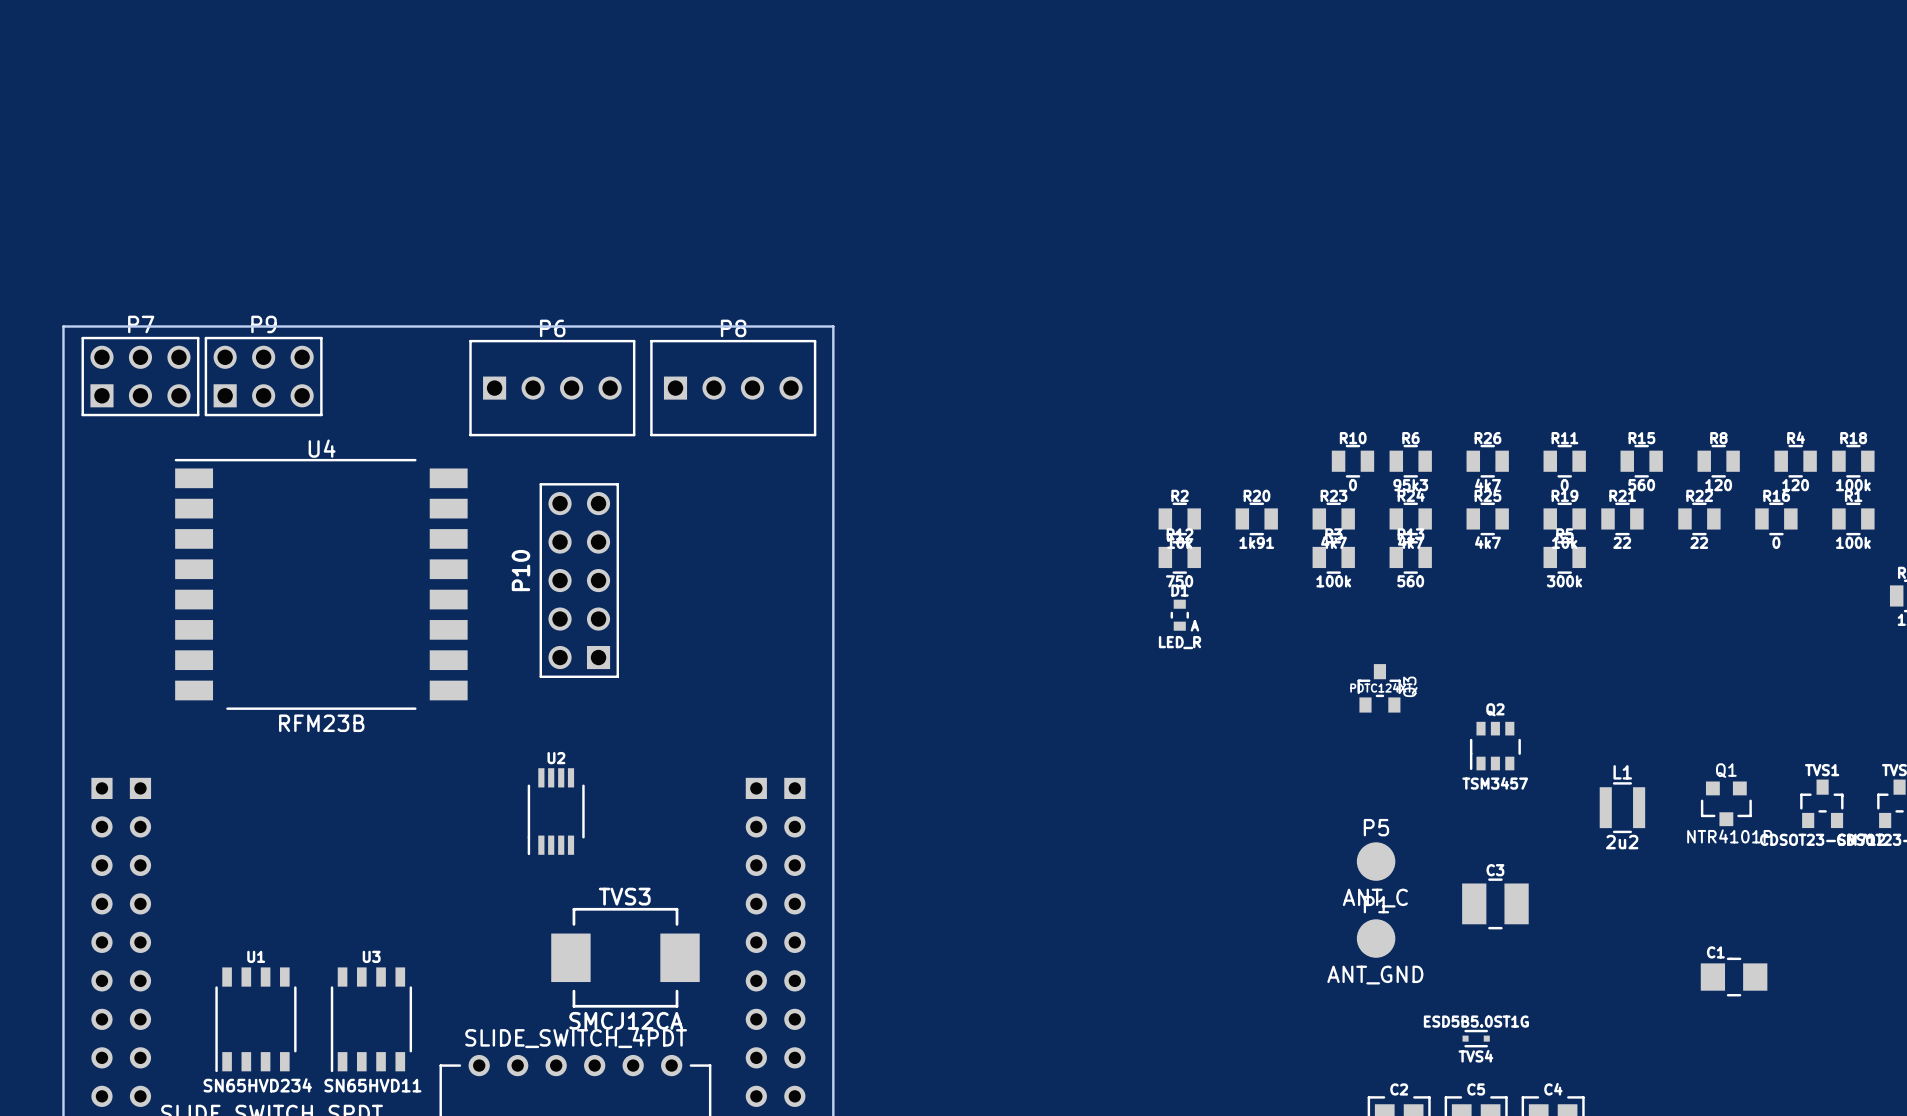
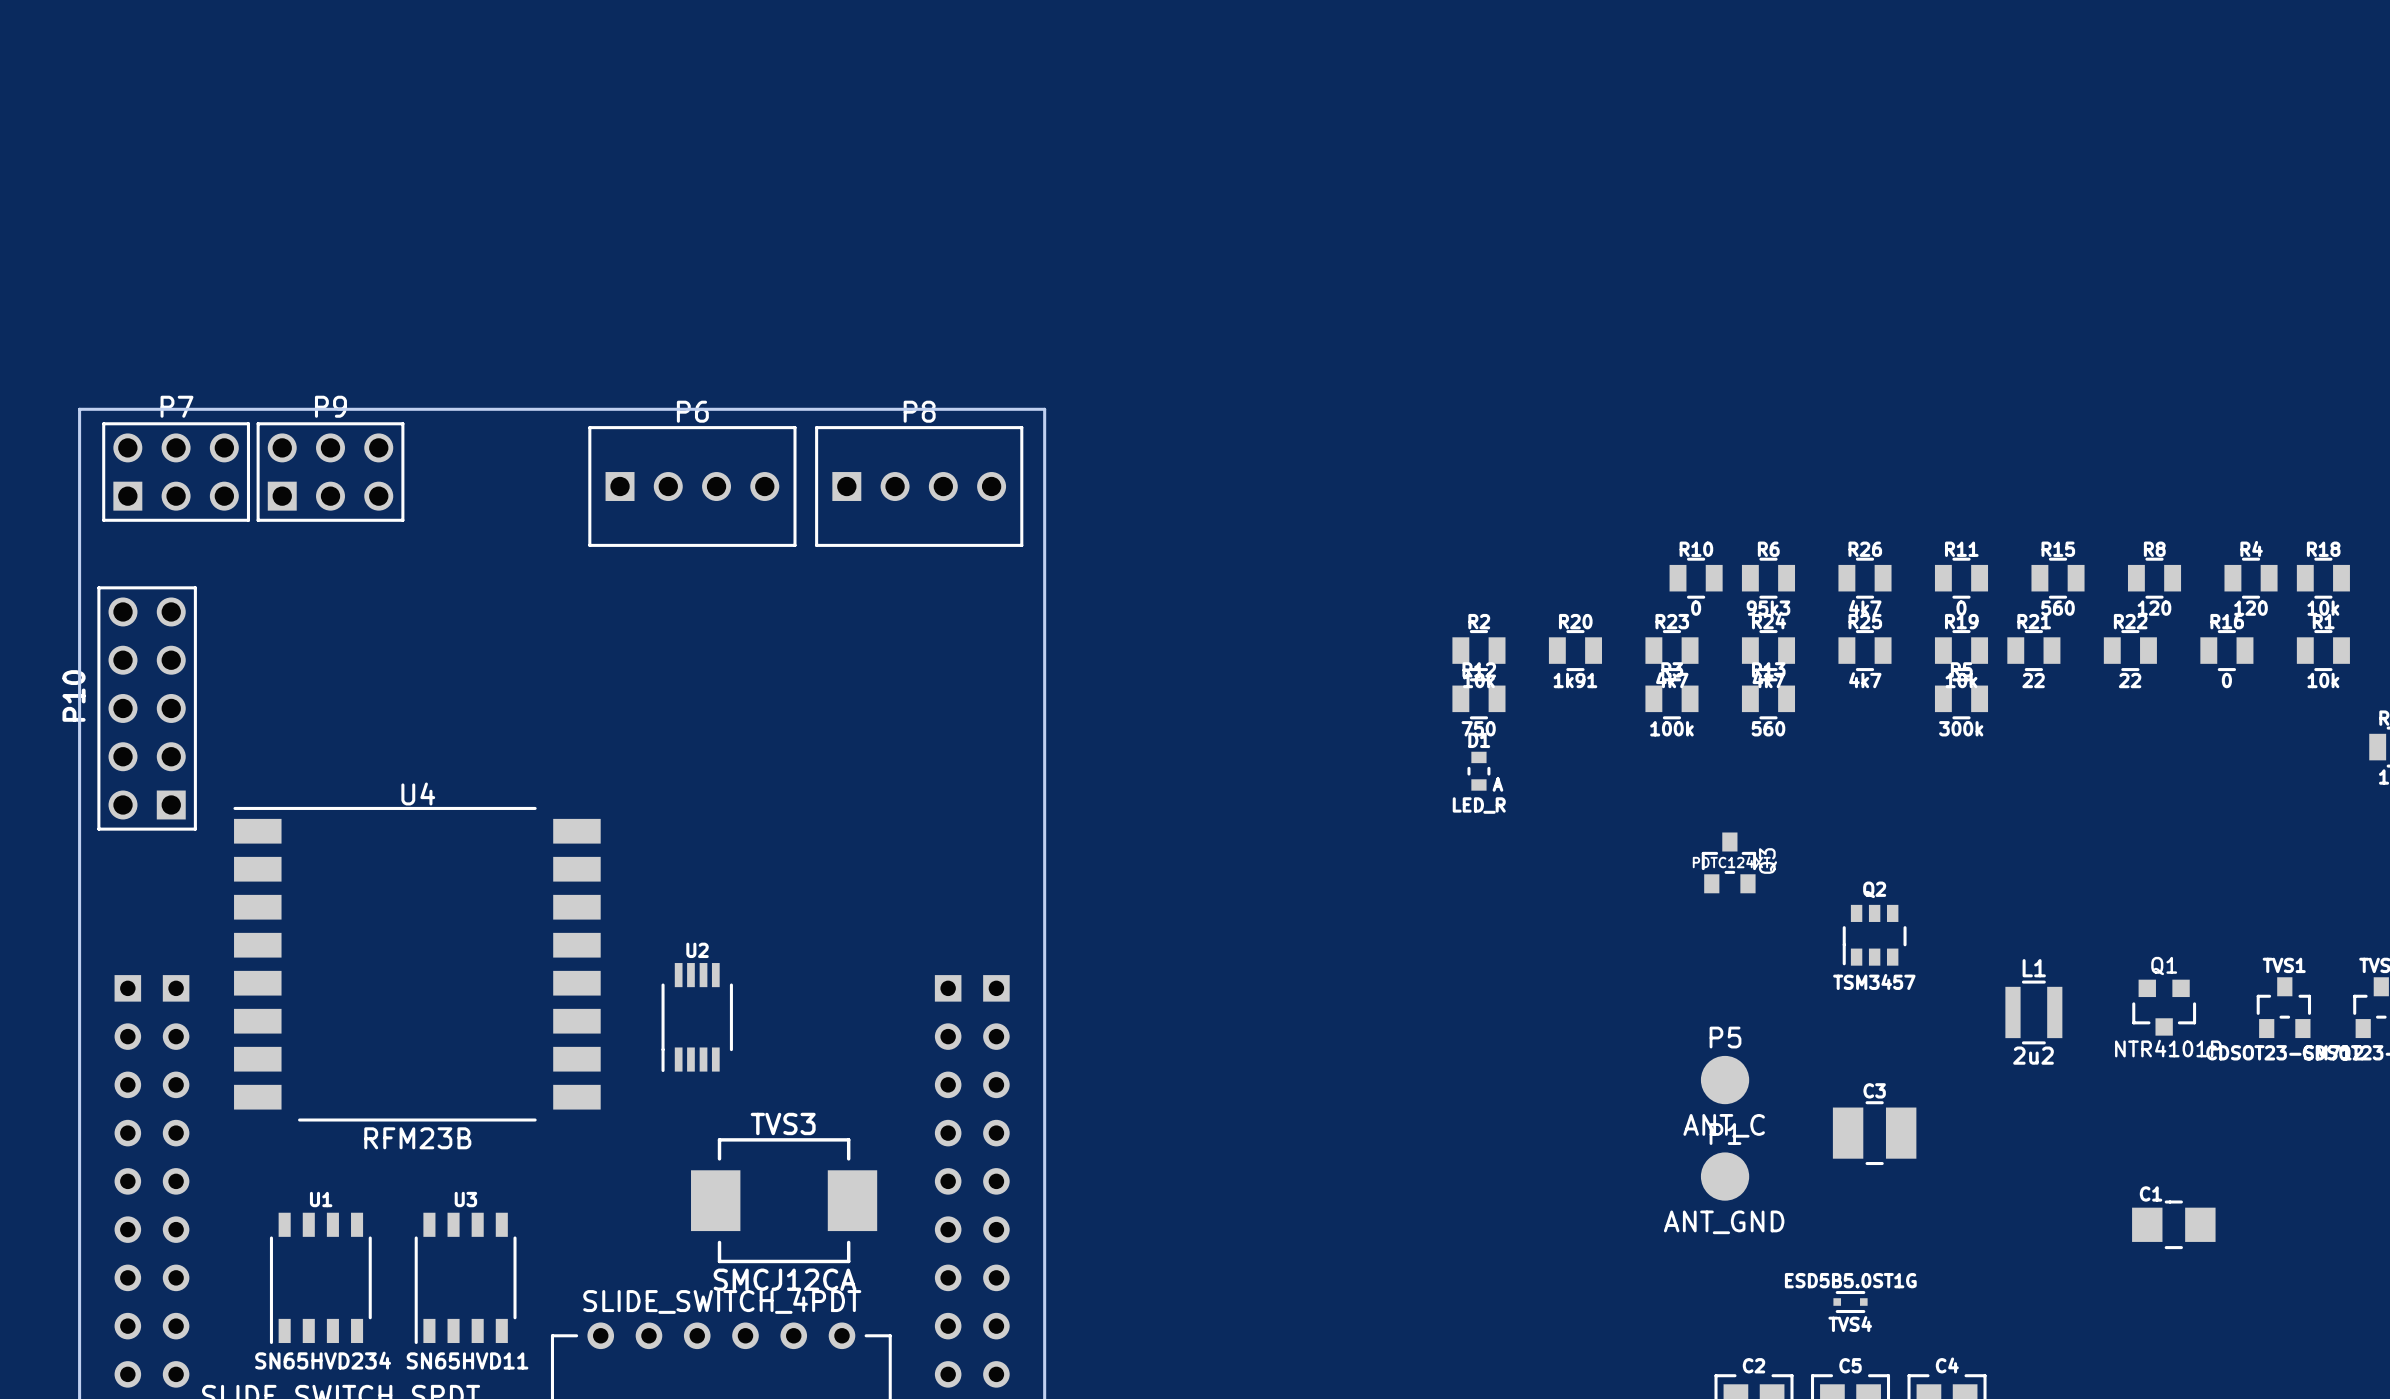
R18 value: 100k (1853, 485) -> 10k (2323, 608)
R1 value: 100k (1853, 542) -> 10k (2323, 680)
P10 position: (579, 580) -> (147, 708)
U4 position: (321, 584) -> (417, 964)

